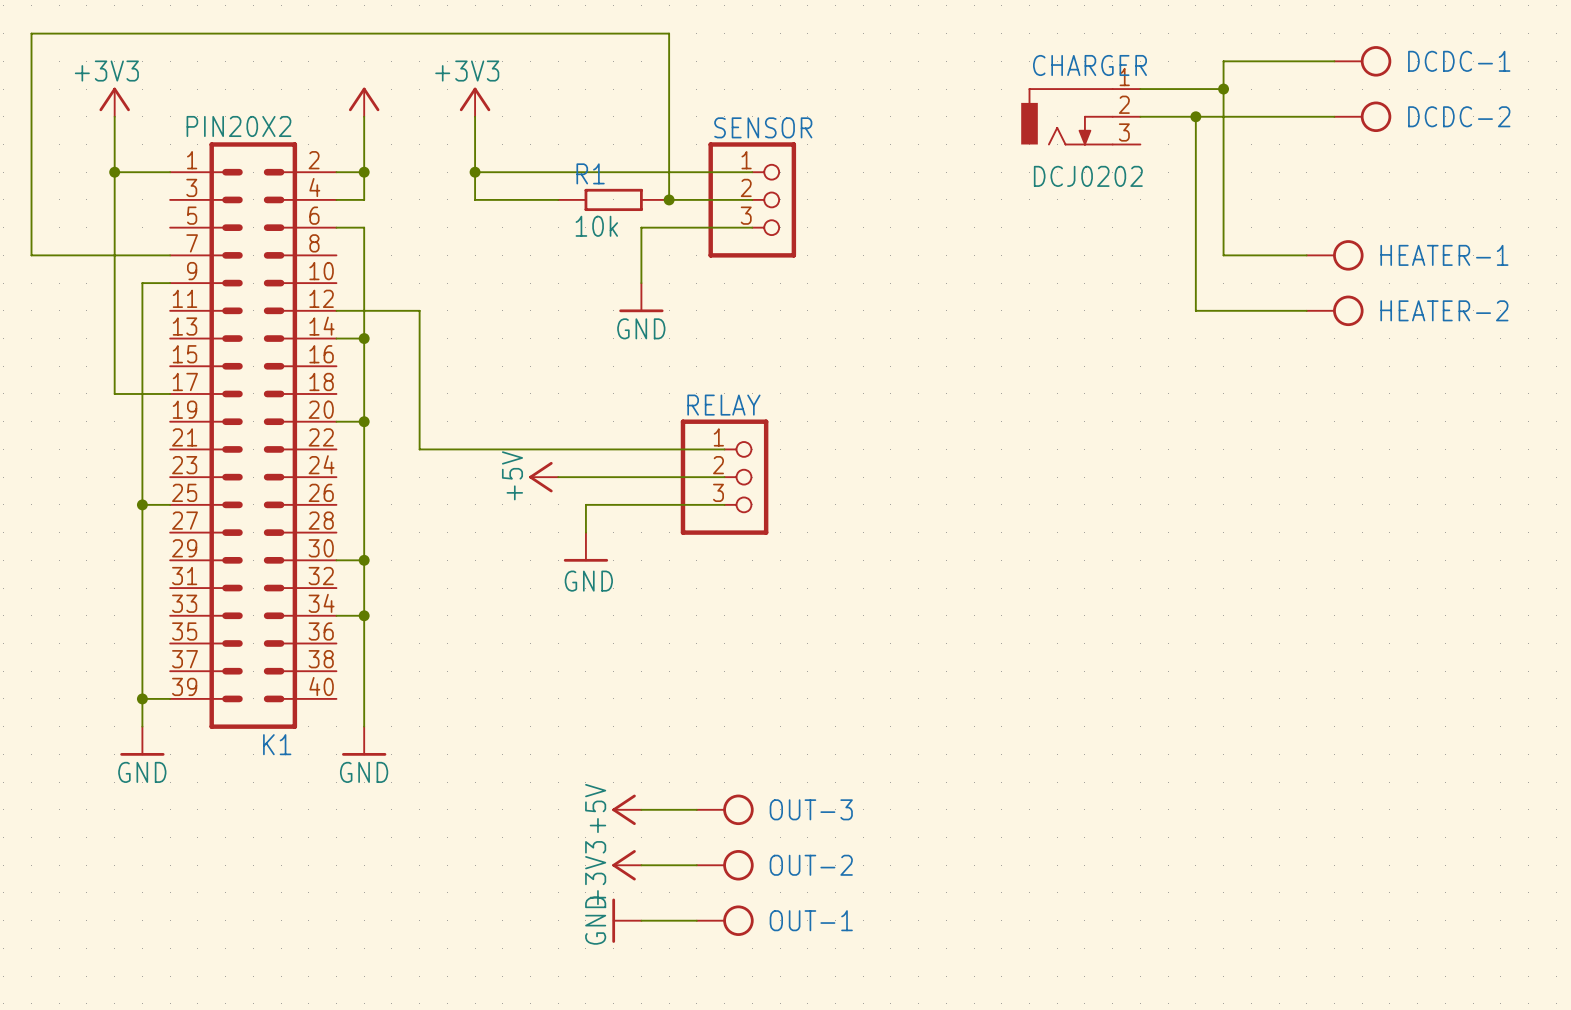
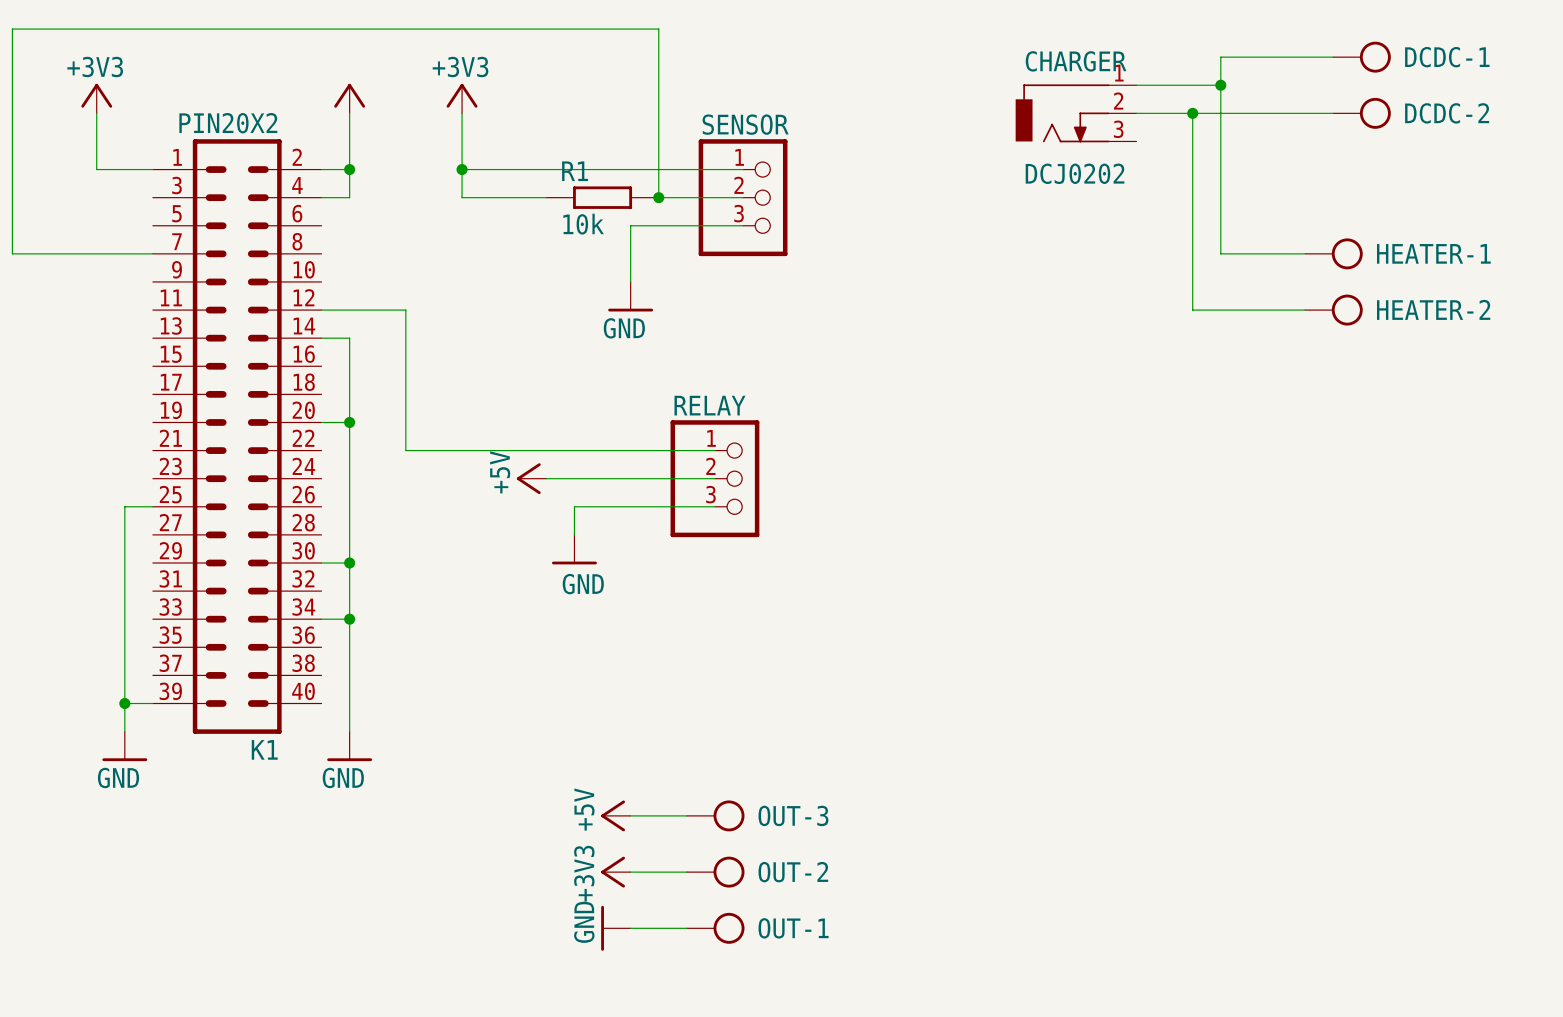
wire: (114, 172) (114, 393) (170, 393) -> none
junction: (114, 172) -> none
wire: (336, 227) (364, 227) (364, 338) -> none
wire: (170, 283) (142, 283) (142, 504) -> none
junction: (364, 338) -> none
junction: (142, 504) -> none

